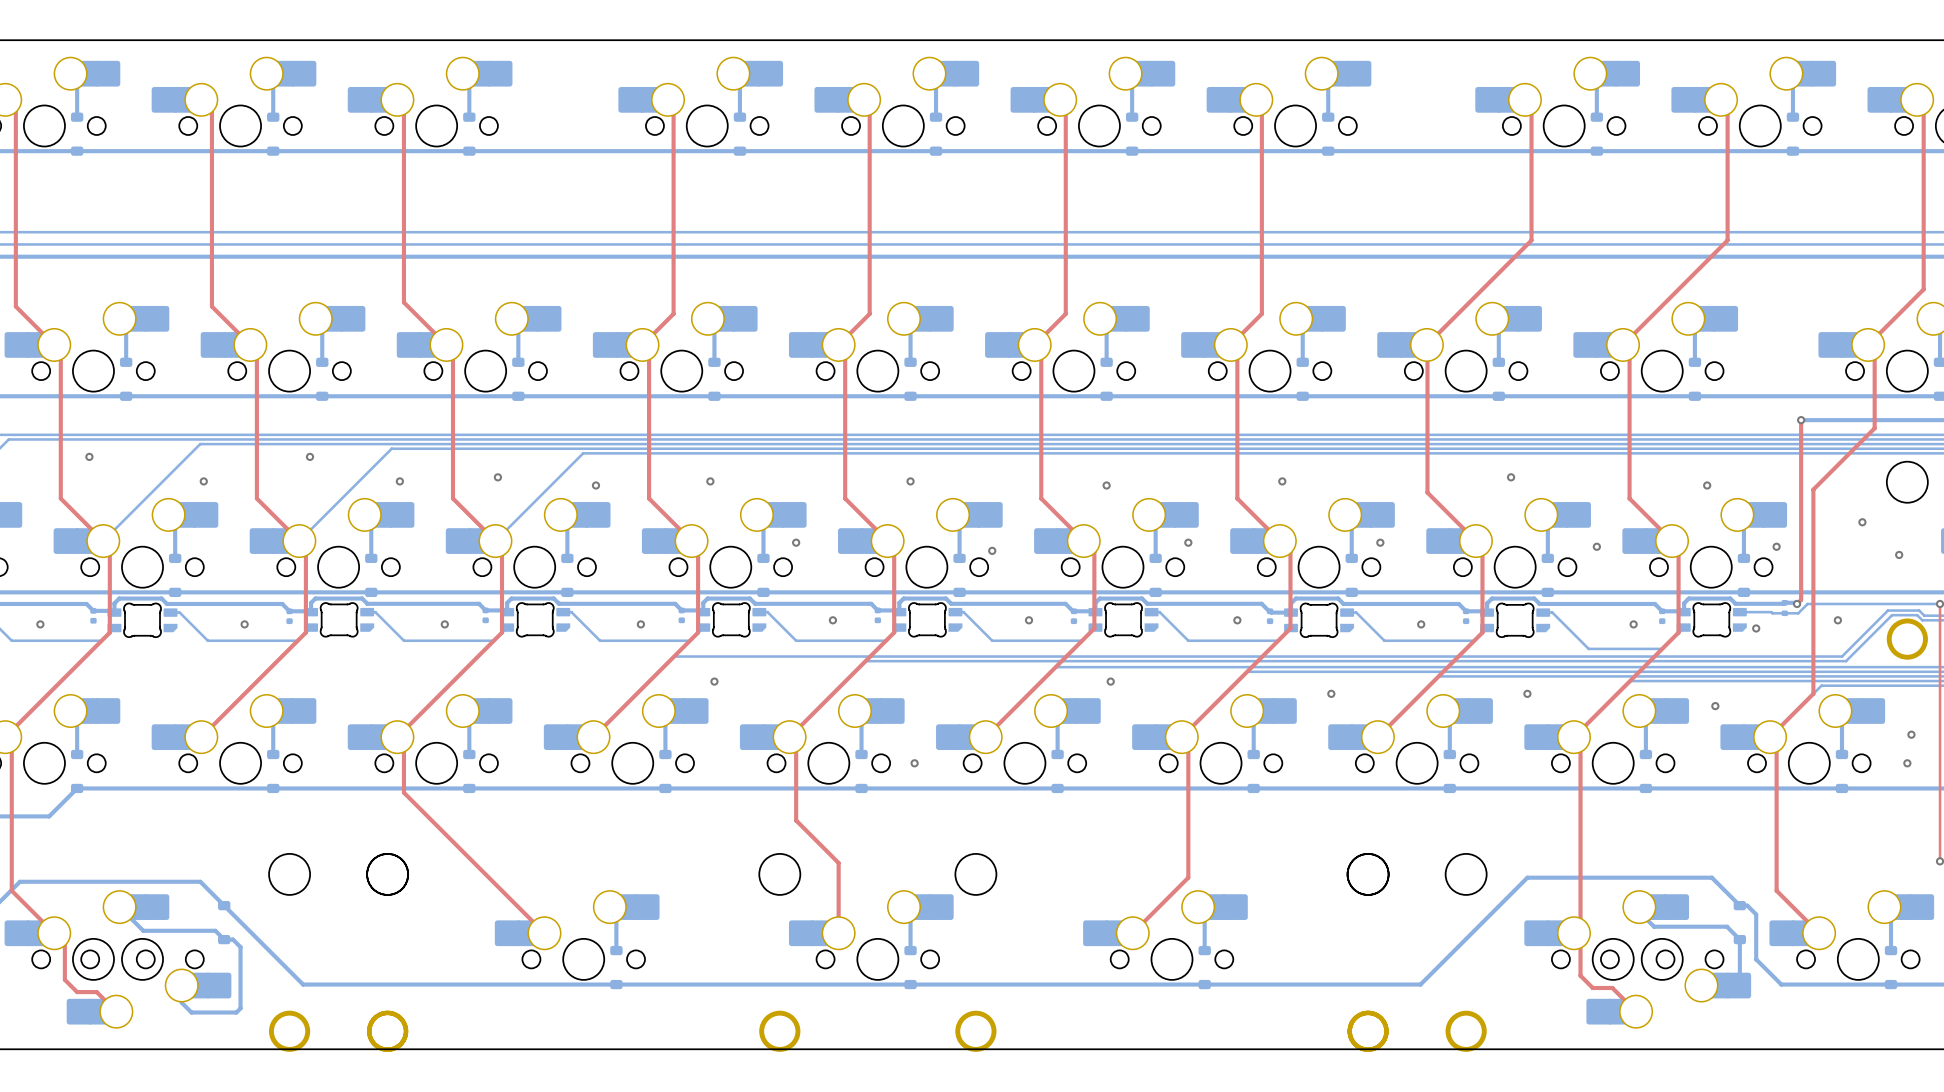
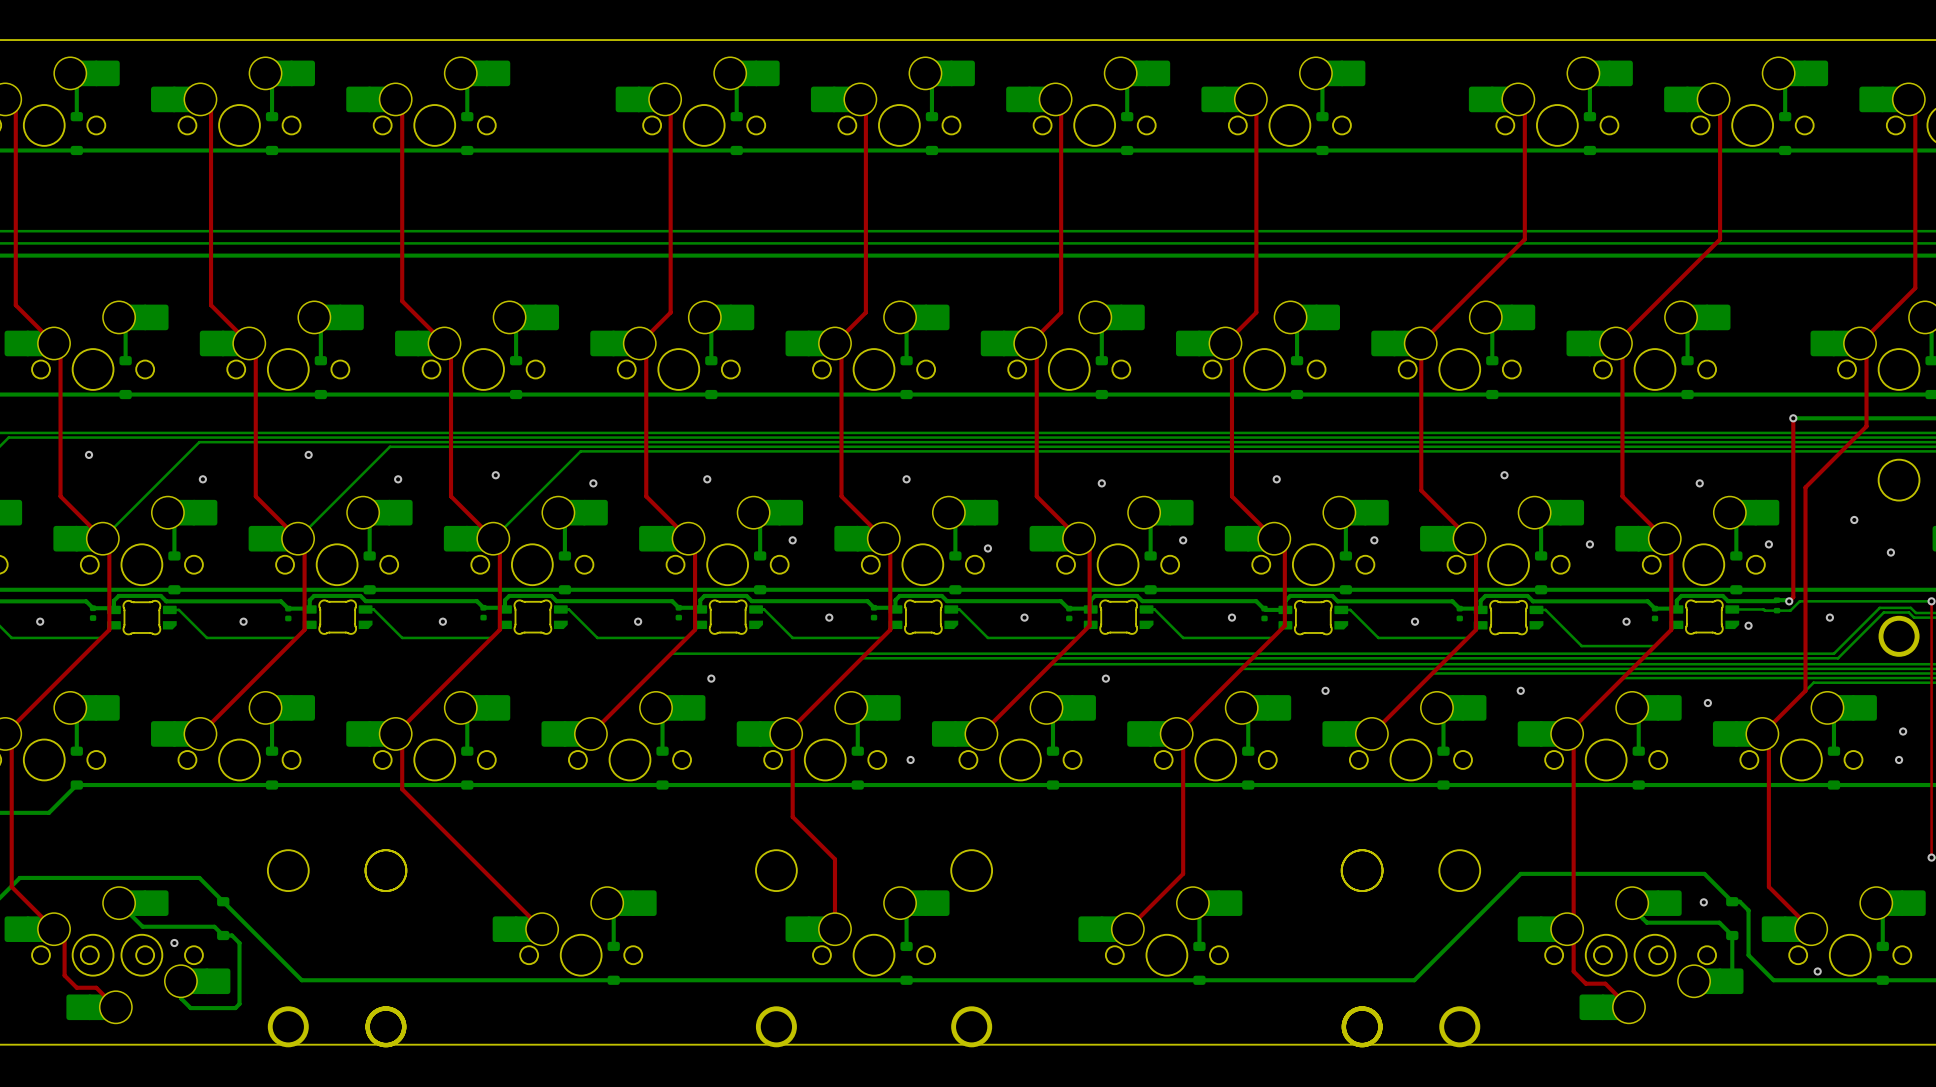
via: none -> (1703, 902)
via: none -> (174, 943)
via: none -> (1817, 971)

